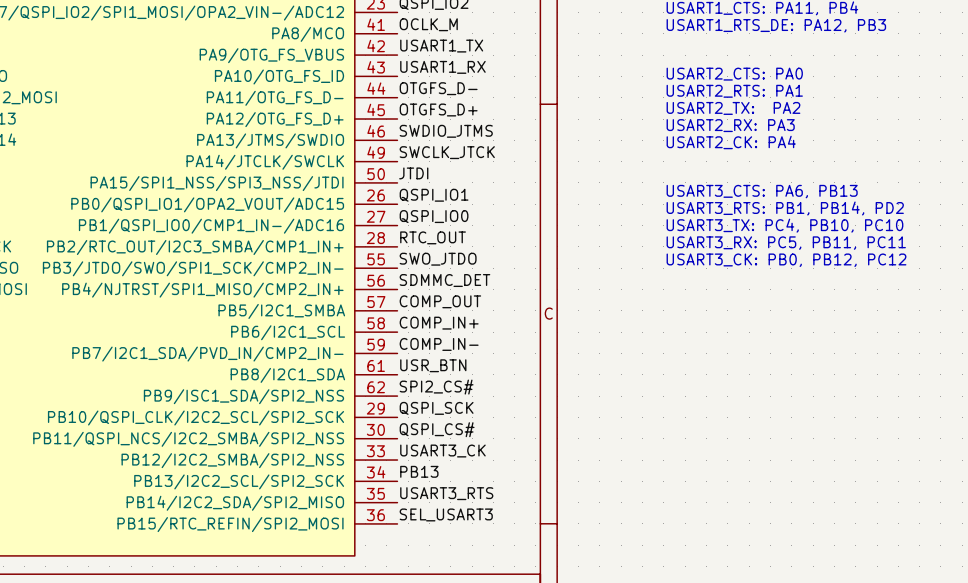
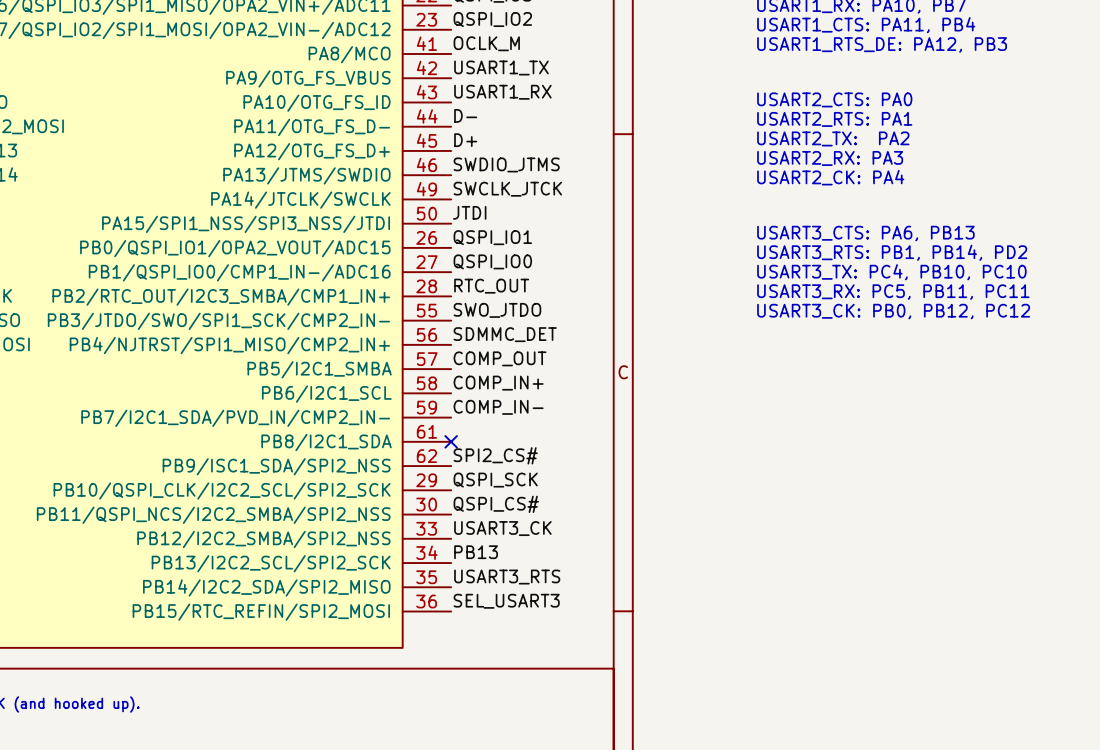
label: OTGFS_D- (438, 88) -> D- (465, 115)
label: OTGFS_D+ (438, 110) -> D+ (465, 140)
label: USR_BTN (433, 365) -> none
no-connect mark: none -> (451, 441)

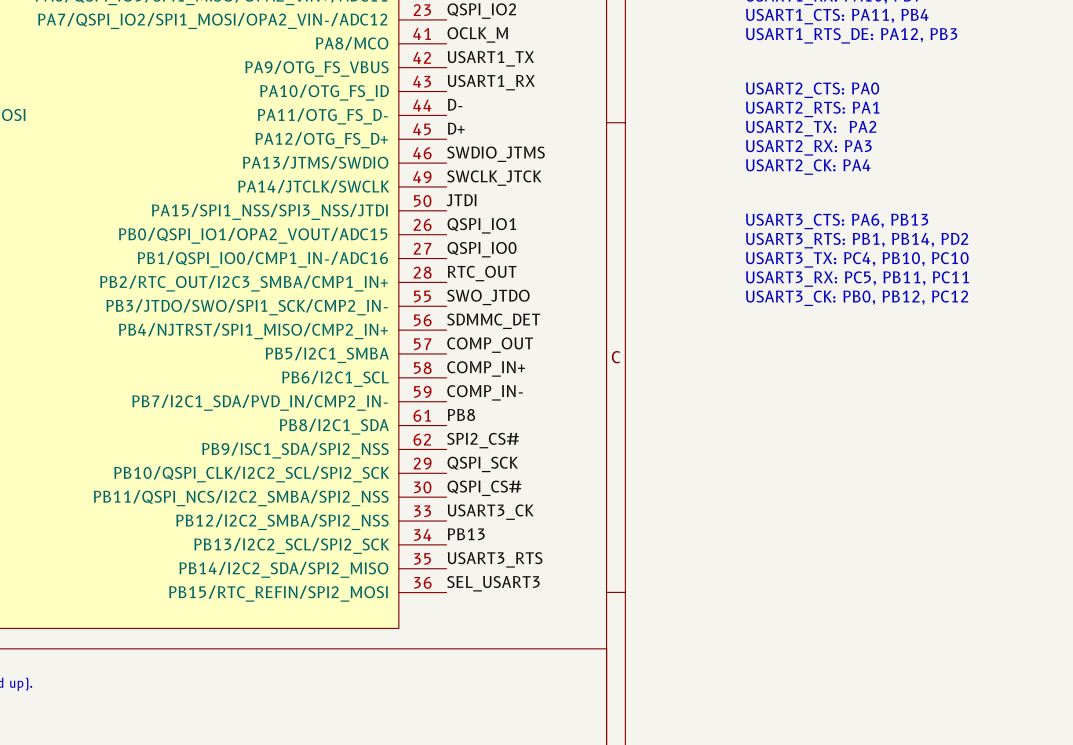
label: none -> PB8 (461, 415)
no-connect mark: (451, 441) -> none

